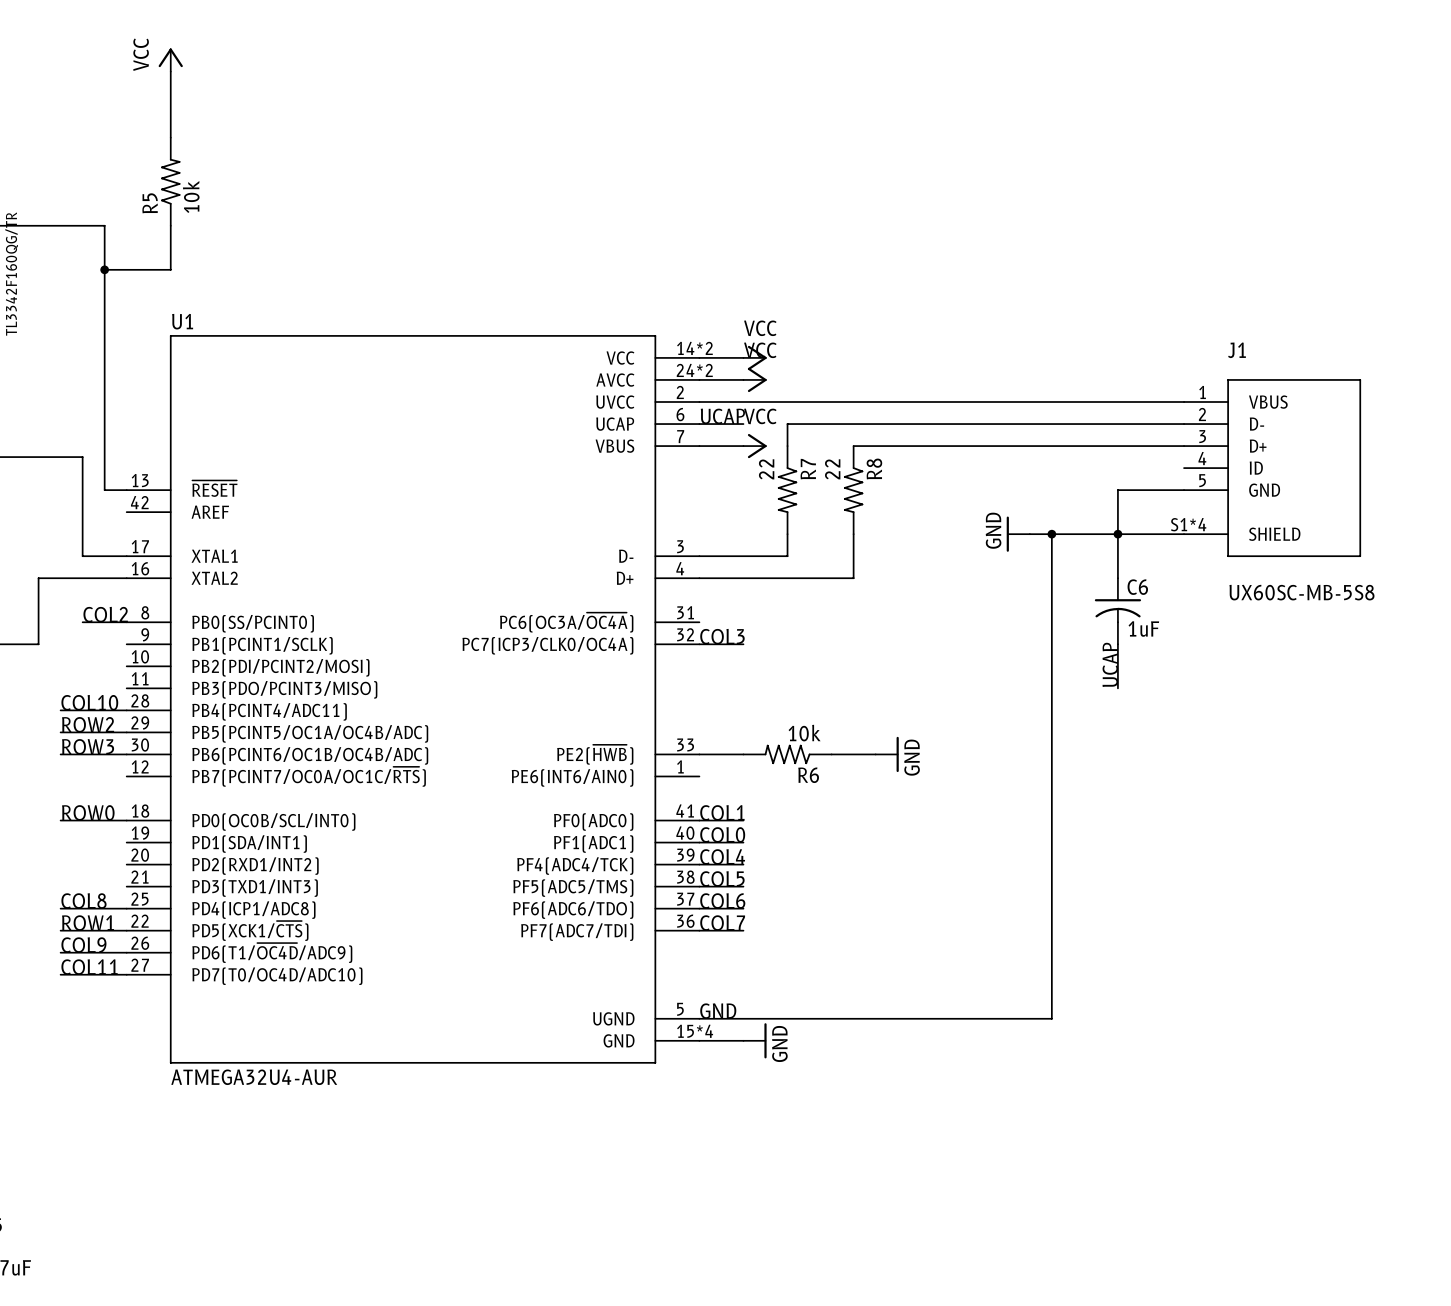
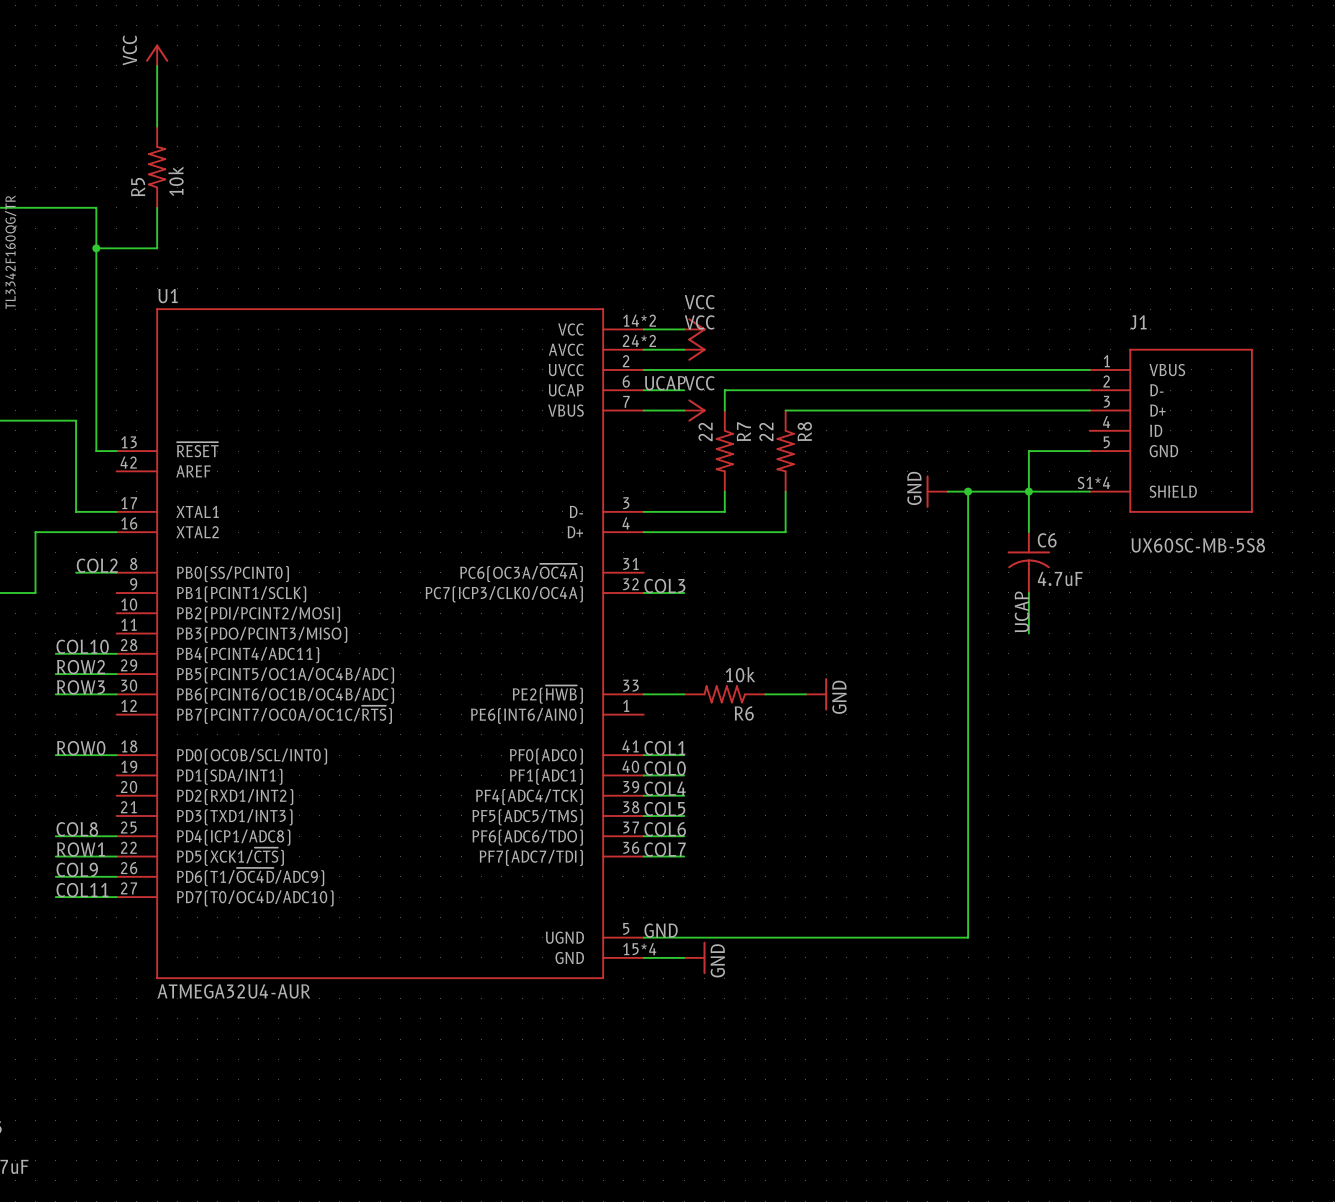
C6 value: 1uF (1143, 628) -> 4.7uF (1060, 578)

